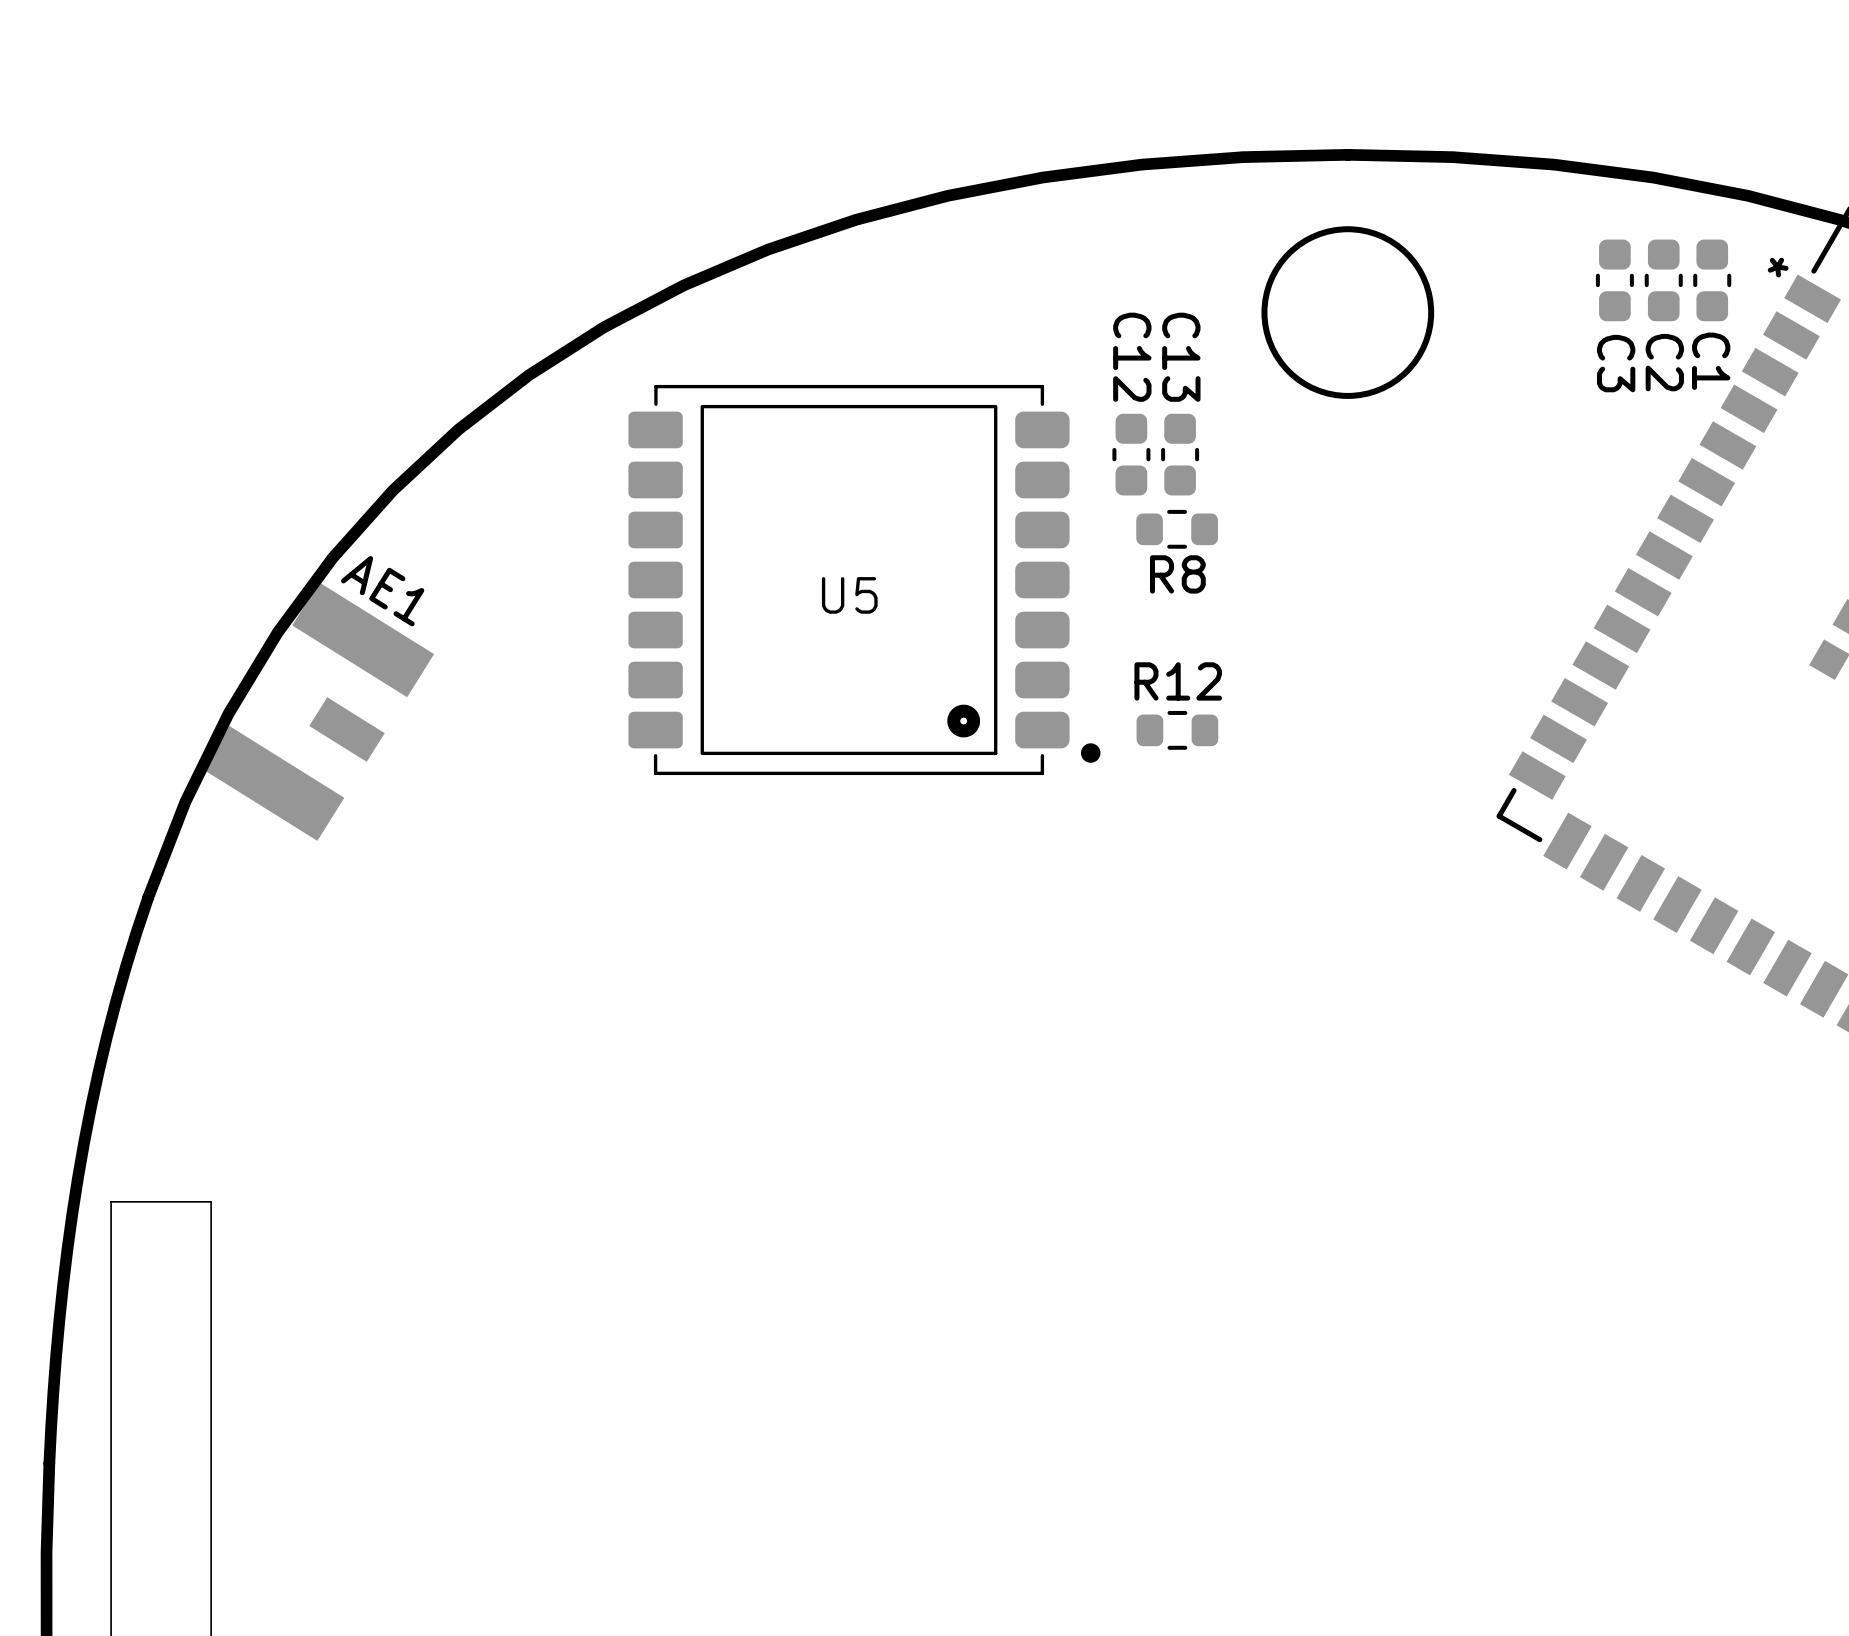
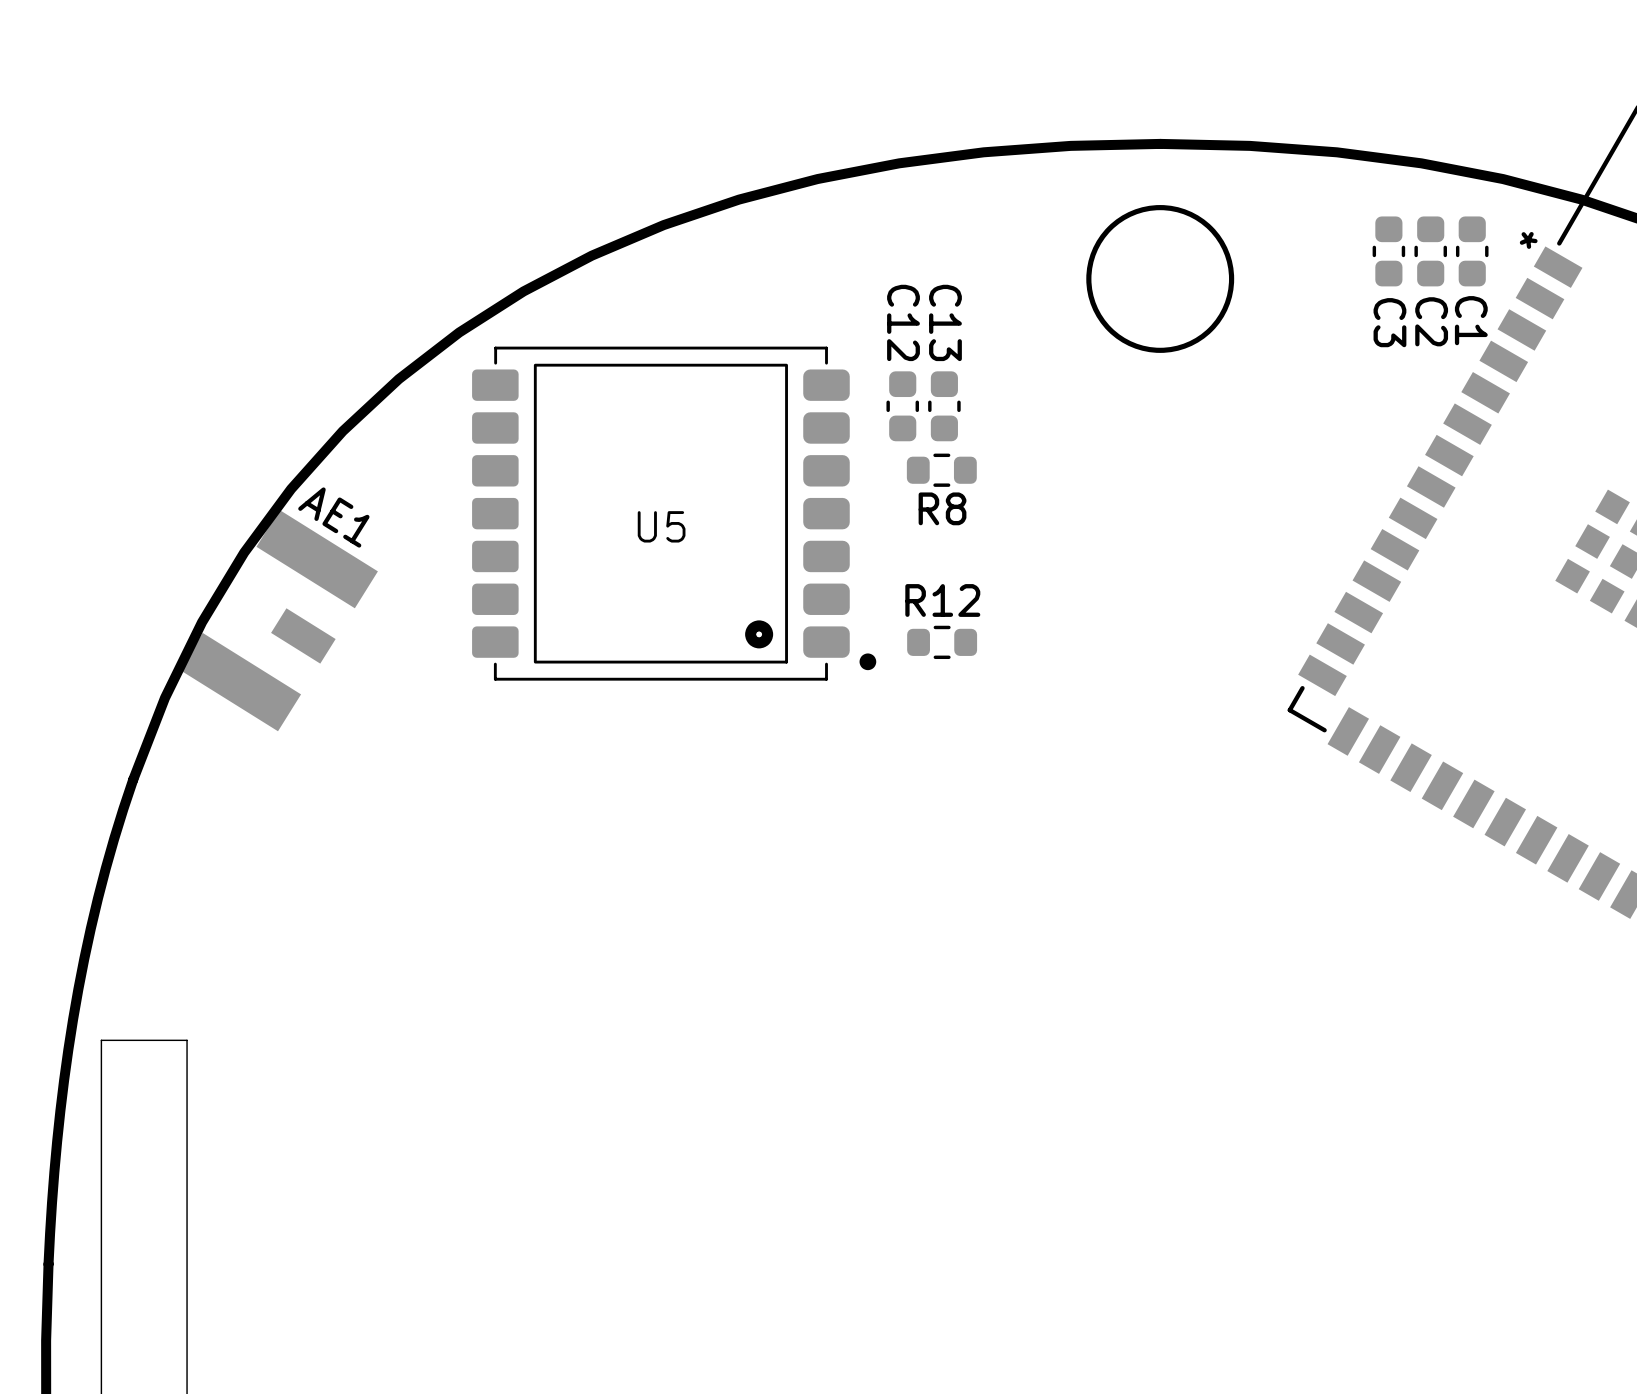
C12 position: (1131, 454) -> (902, 406)
C13 position: (1180, 454) -> (944, 406)
R8 position: (1177, 529) -> (941, 470)
U5 position: (864, 579) -> (674, 513)
R12 position: (1177, 730) -> (942, 642)

